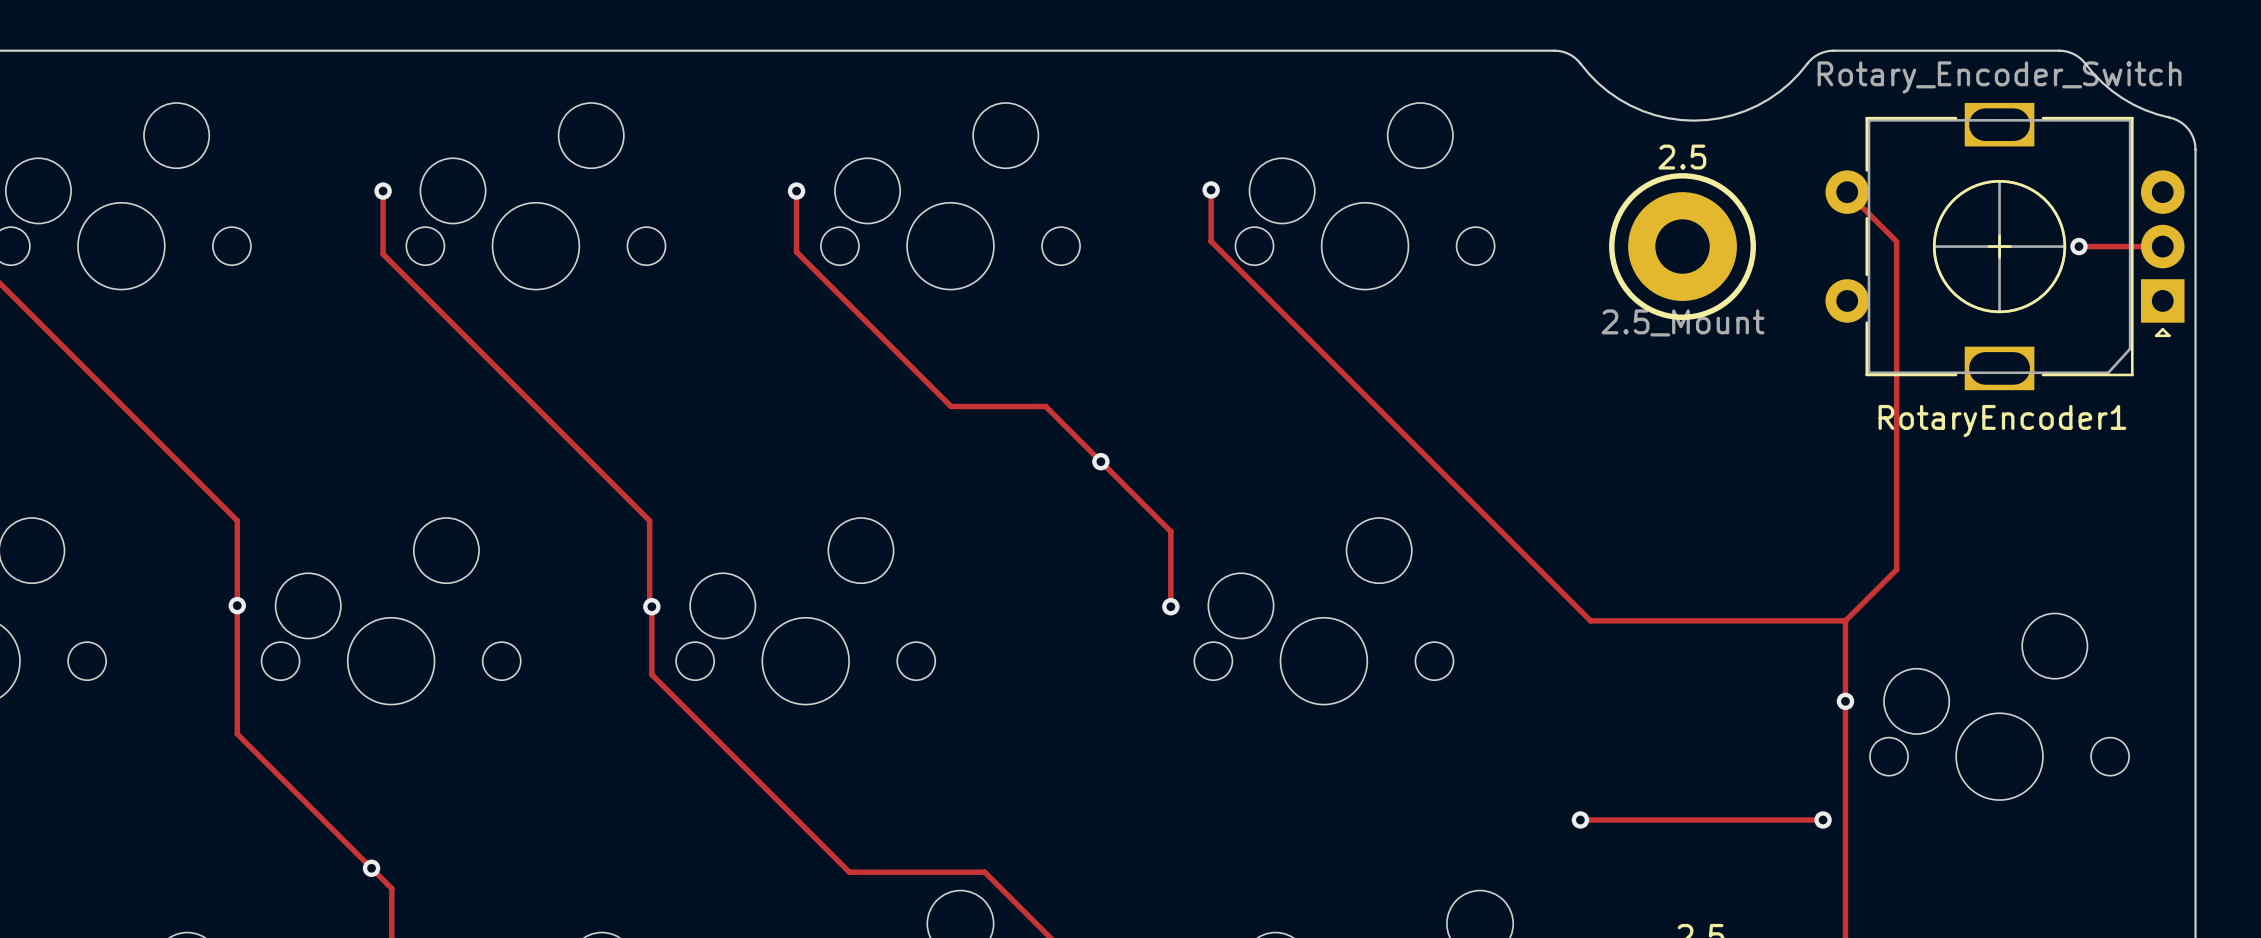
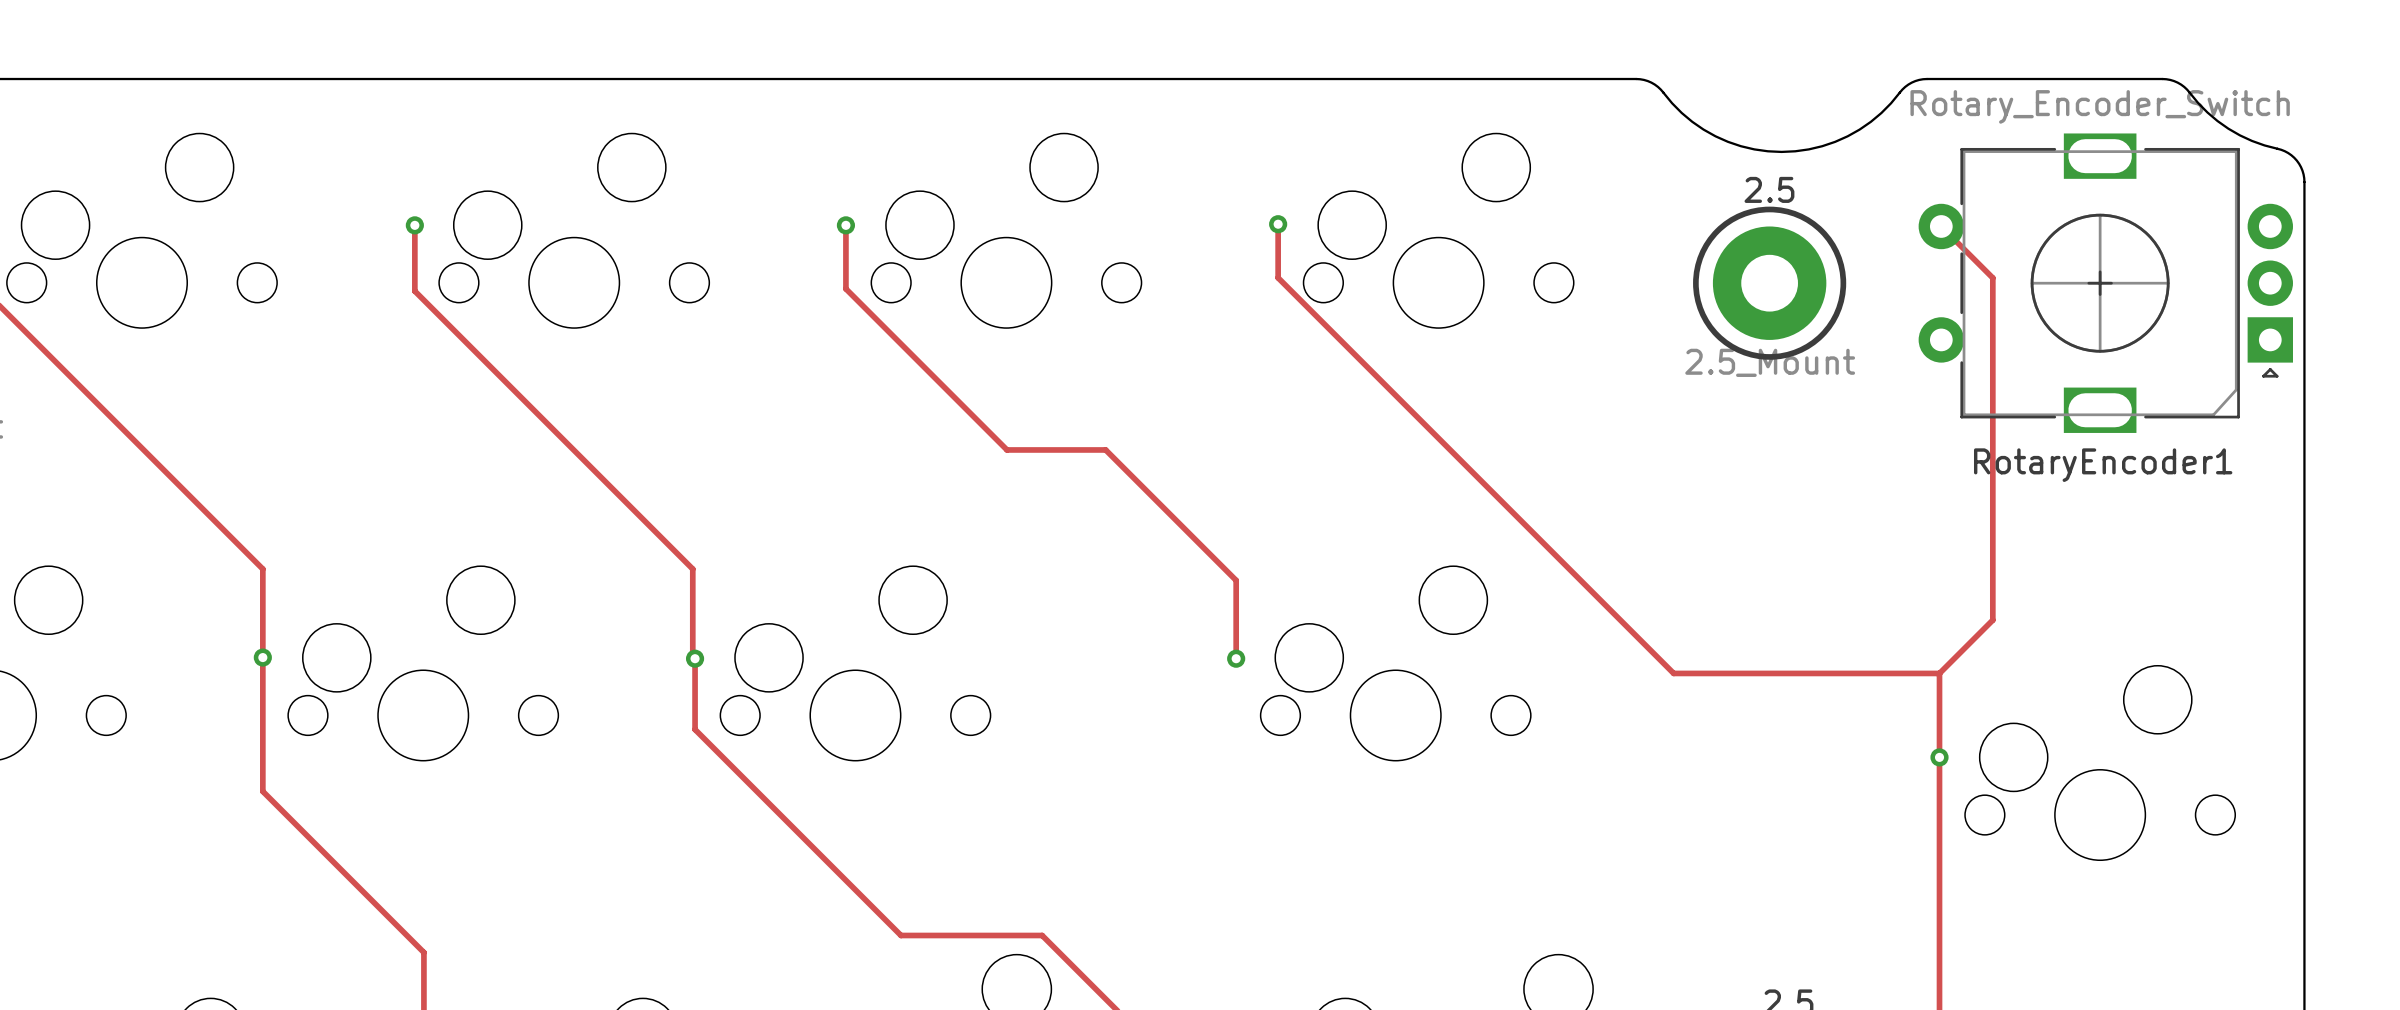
track: (2078, 246) (2162, 246) -> none
via: (2078, 246) -> none
via: (1100, 461) -> none
track: (1580, 819) (1823, 819) -> none
via: (1580, 819) -> none
via: (1823, 819) -> none
via: (371, 868) -> none

